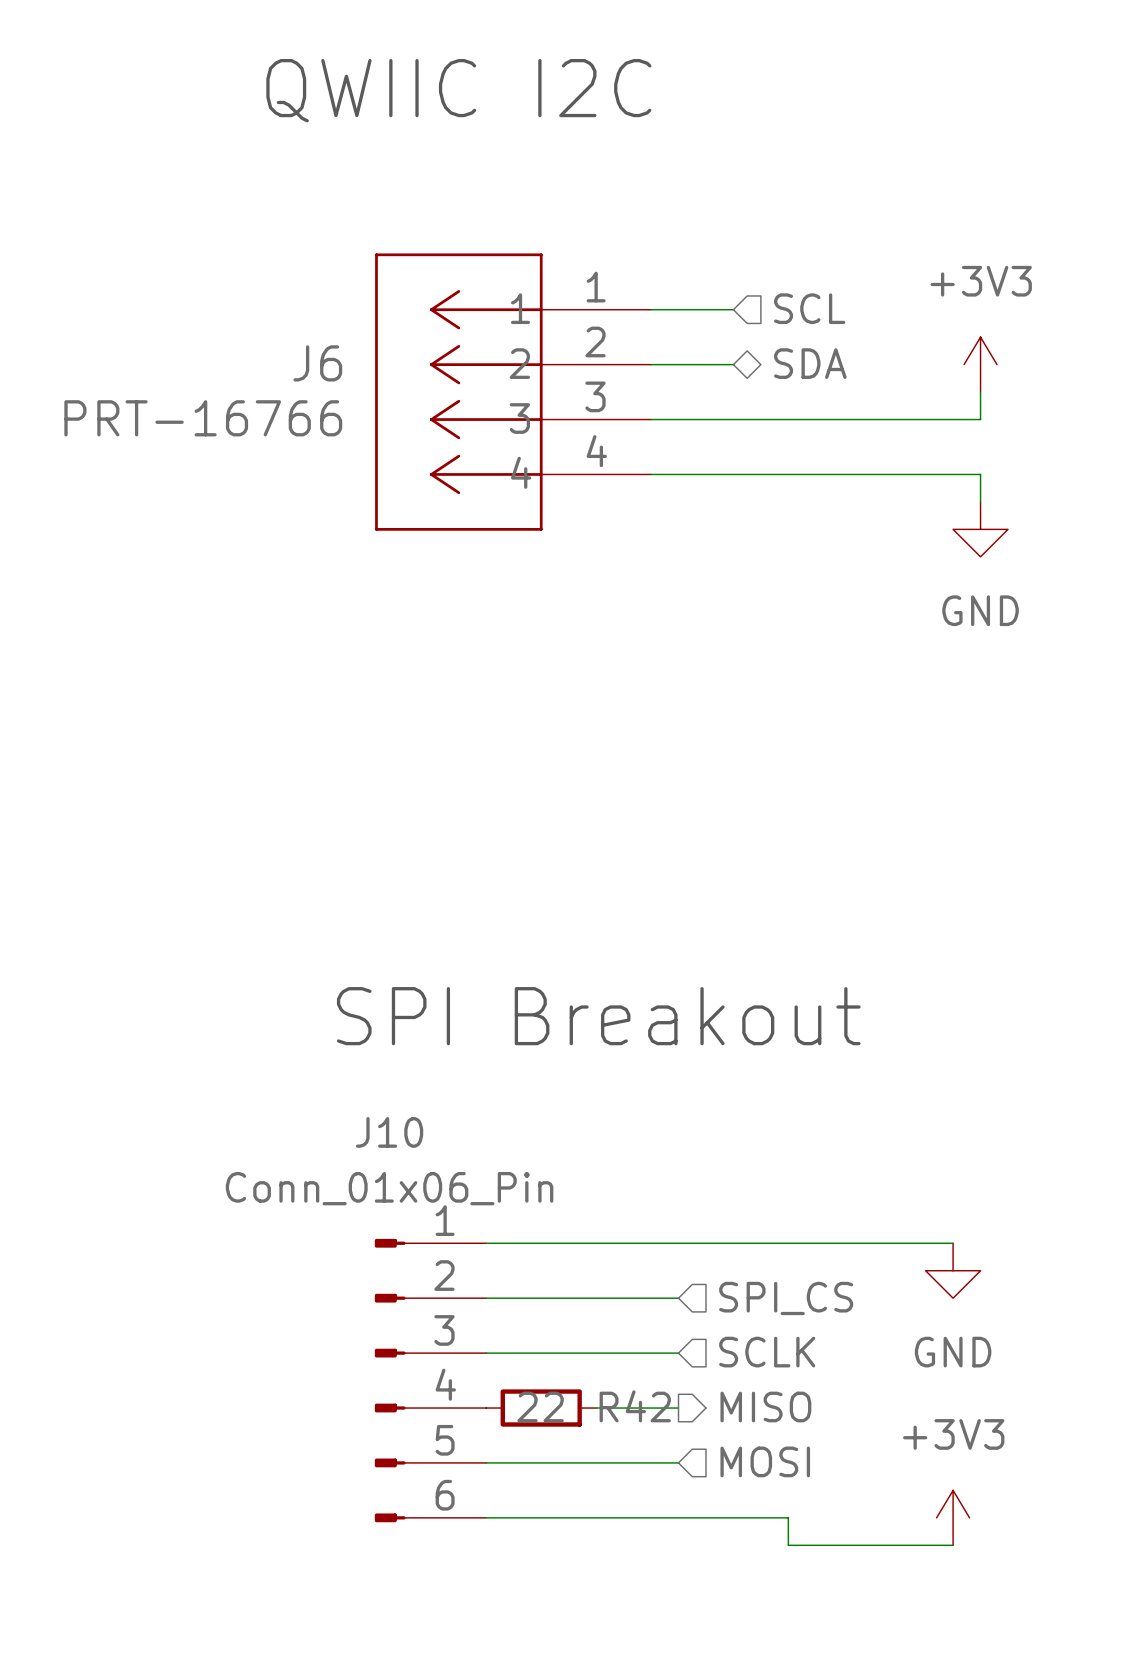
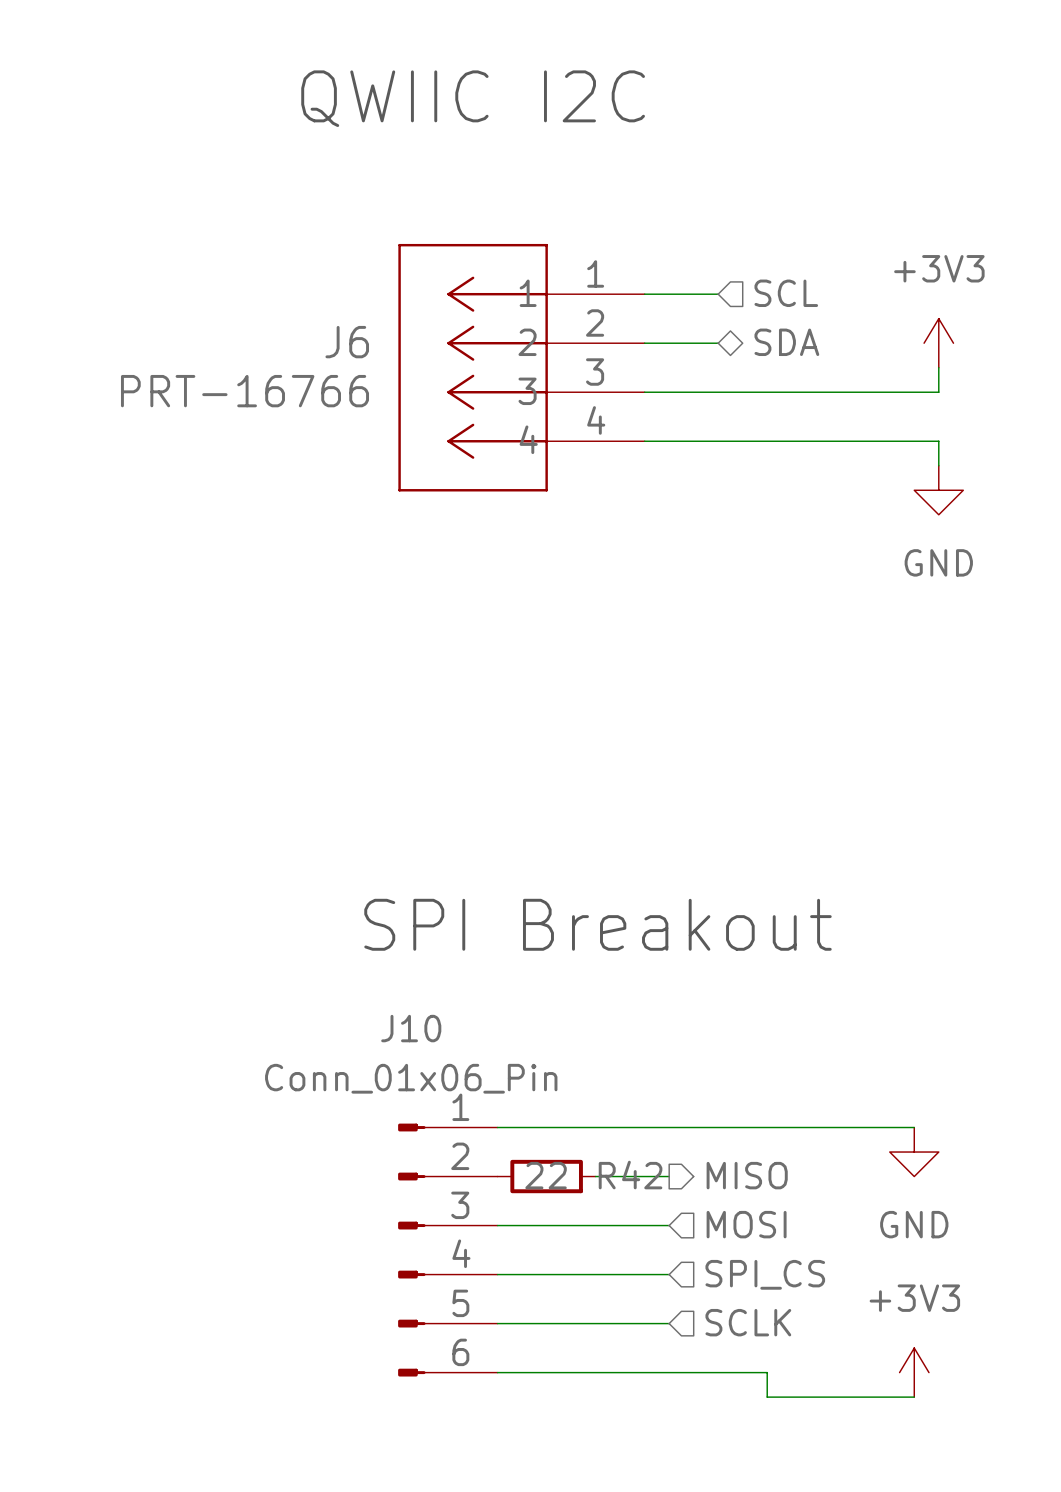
wire: (486, 1298) (596, 1298) -> (497, 1274) (595, 1274)
hierarchical label shape: input (786, 1298) -> output (747, 1175)
hierarchical label: SPI_CS (786, 1298) -> MISO (747, 1175)
hierarchical label: SCLK (767, 1352) -> MOSI (746, 1224)
hierarchical label shape: output (765, 1406) -> input (765, 1274)
hierarchical label: MISO (765, 1406) -> SPI_CS (765, 1274)
R42 position: (541, 1408) -> (546, 1176)
hierarchical label: MOSI (765, 1461) -> SCLK (748, 1322)

